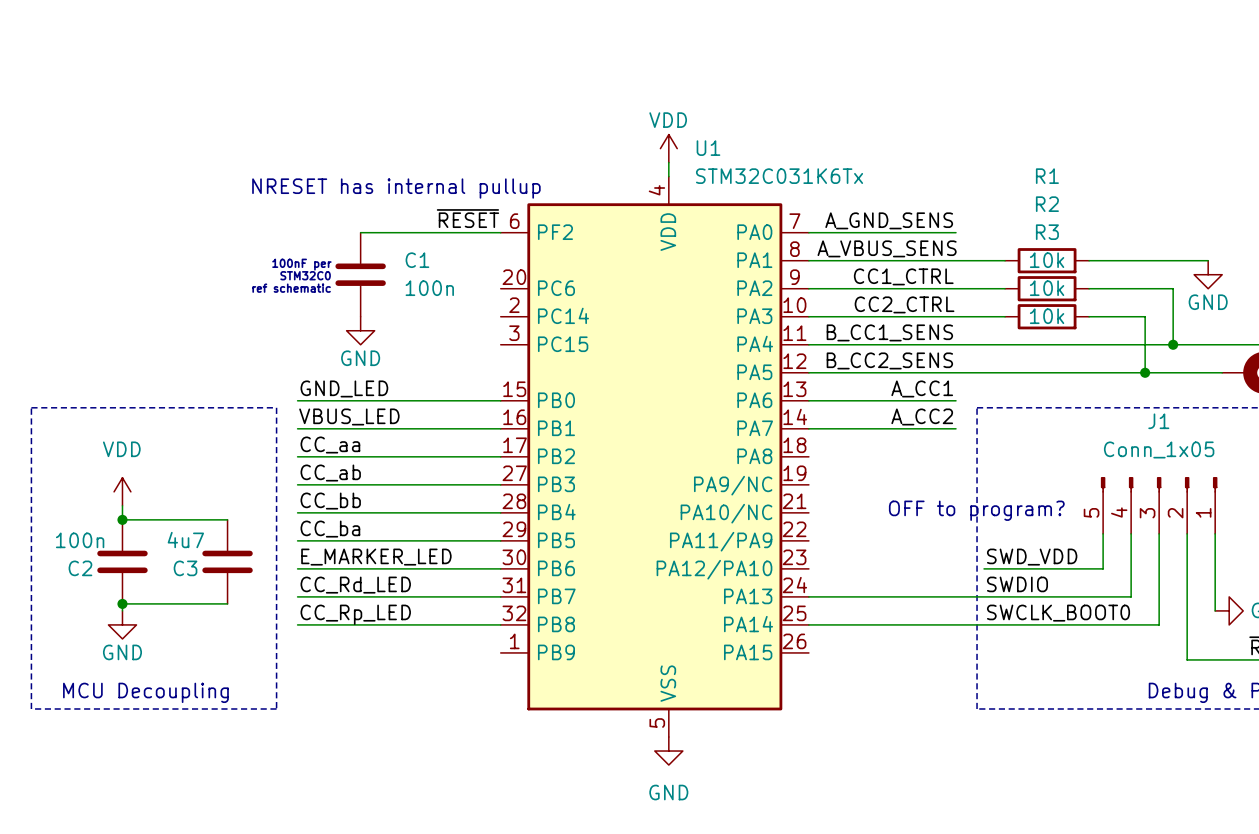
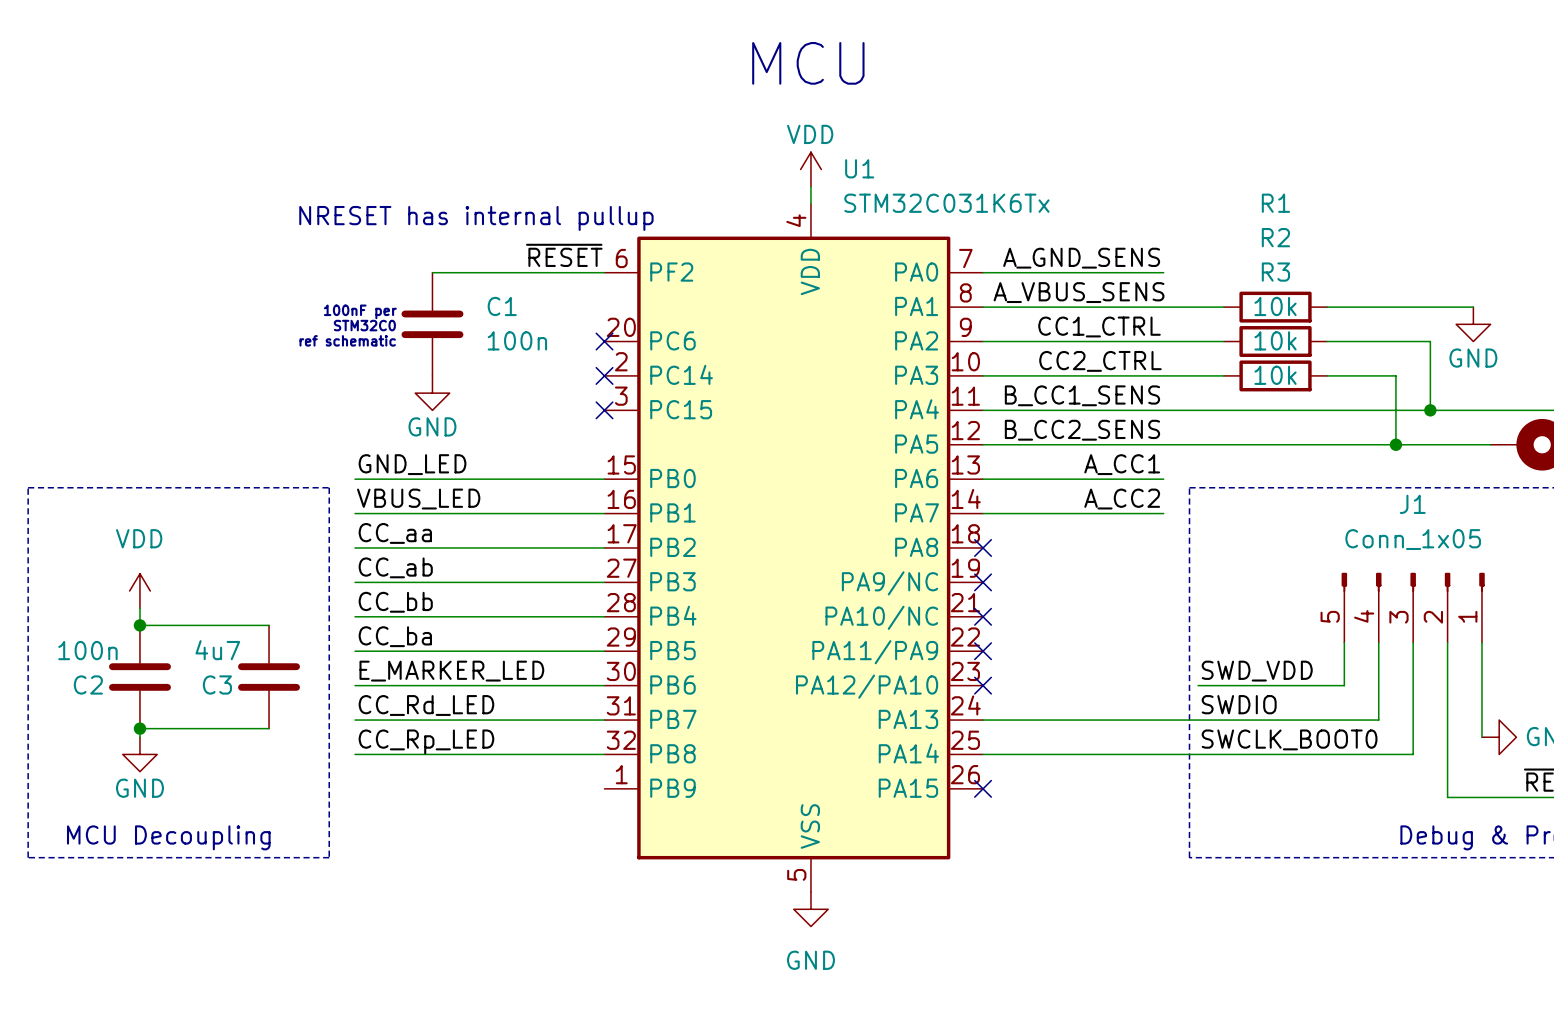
text: none -> MCU (808, 63)
no-connect mark: none -> (604, 341)
no-connect mark: none -> (604, 375)
no-connect mark: none -> (604, 410)
no-connect mark: none -> (983, 547)
no-connect mark: none -> (983, 582)
text: OFF to program? (976, 510) -> none
no-connect mark: none -> (983, 616)
no-connect mark: none -> (983, 651)
no-connect mark: none -> (983, 685)
no-connect mark: none -> (983, 788)

